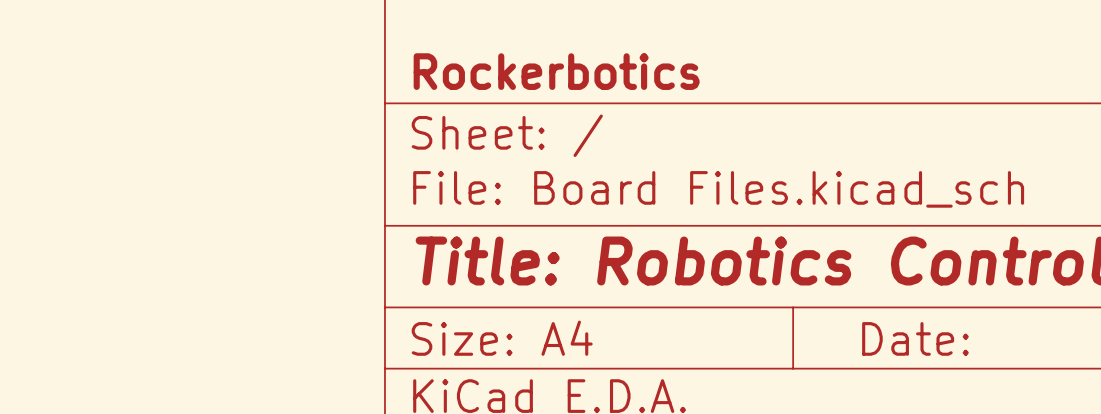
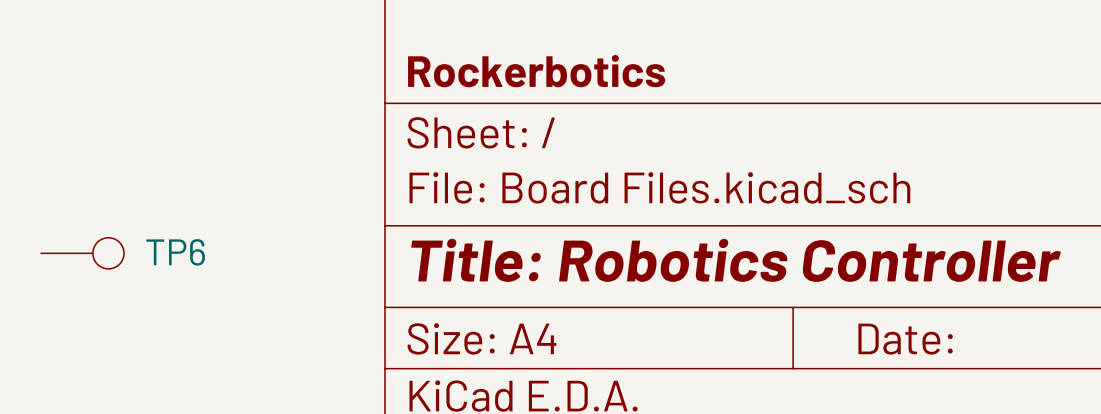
TP6: none -> (82, 253)

